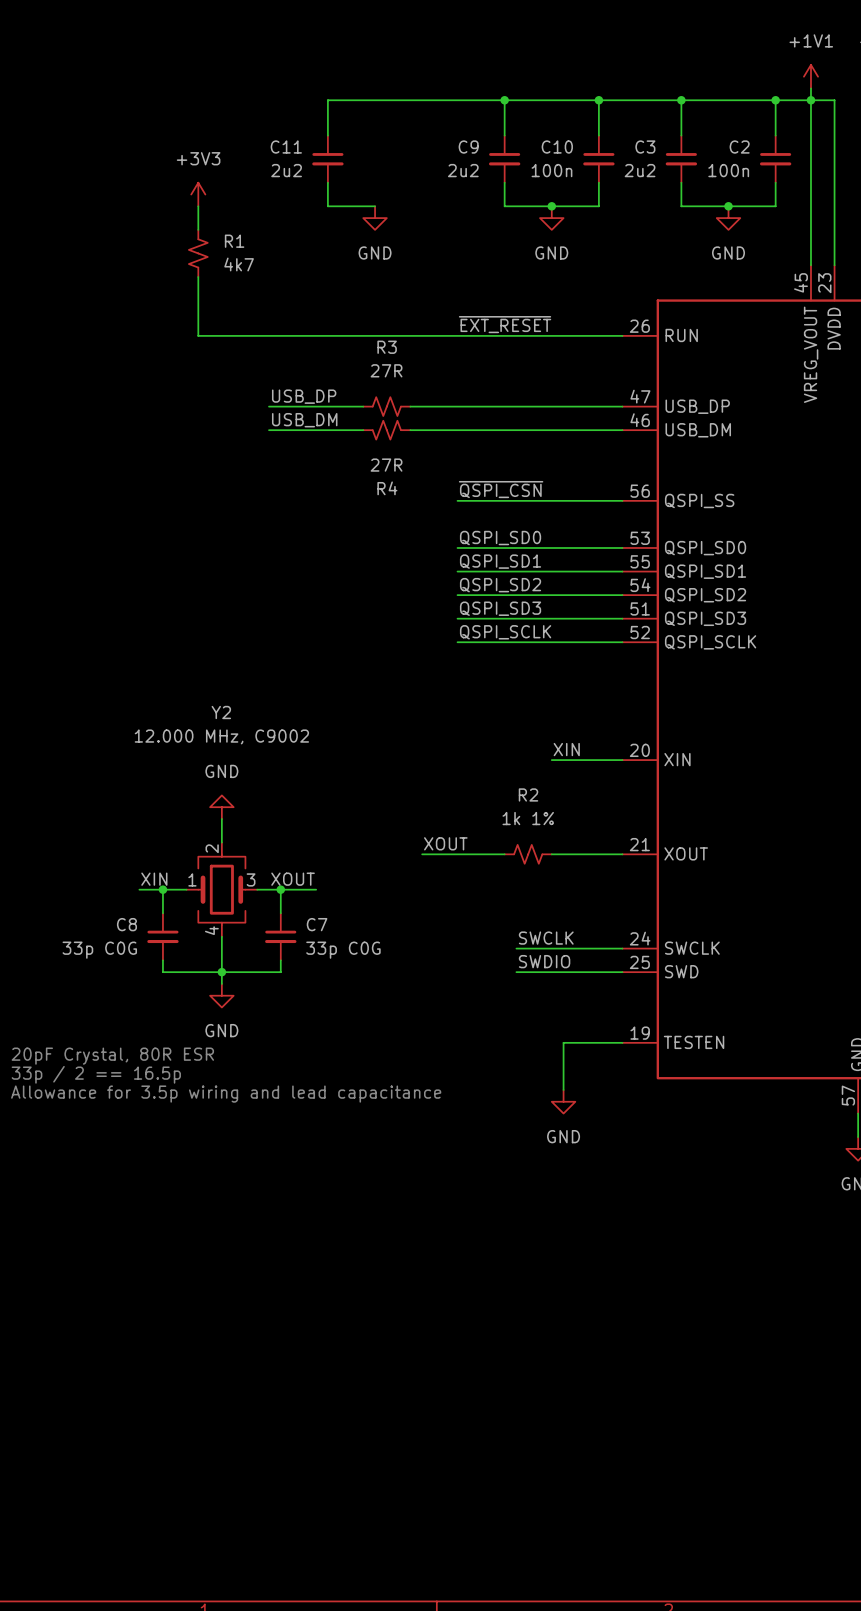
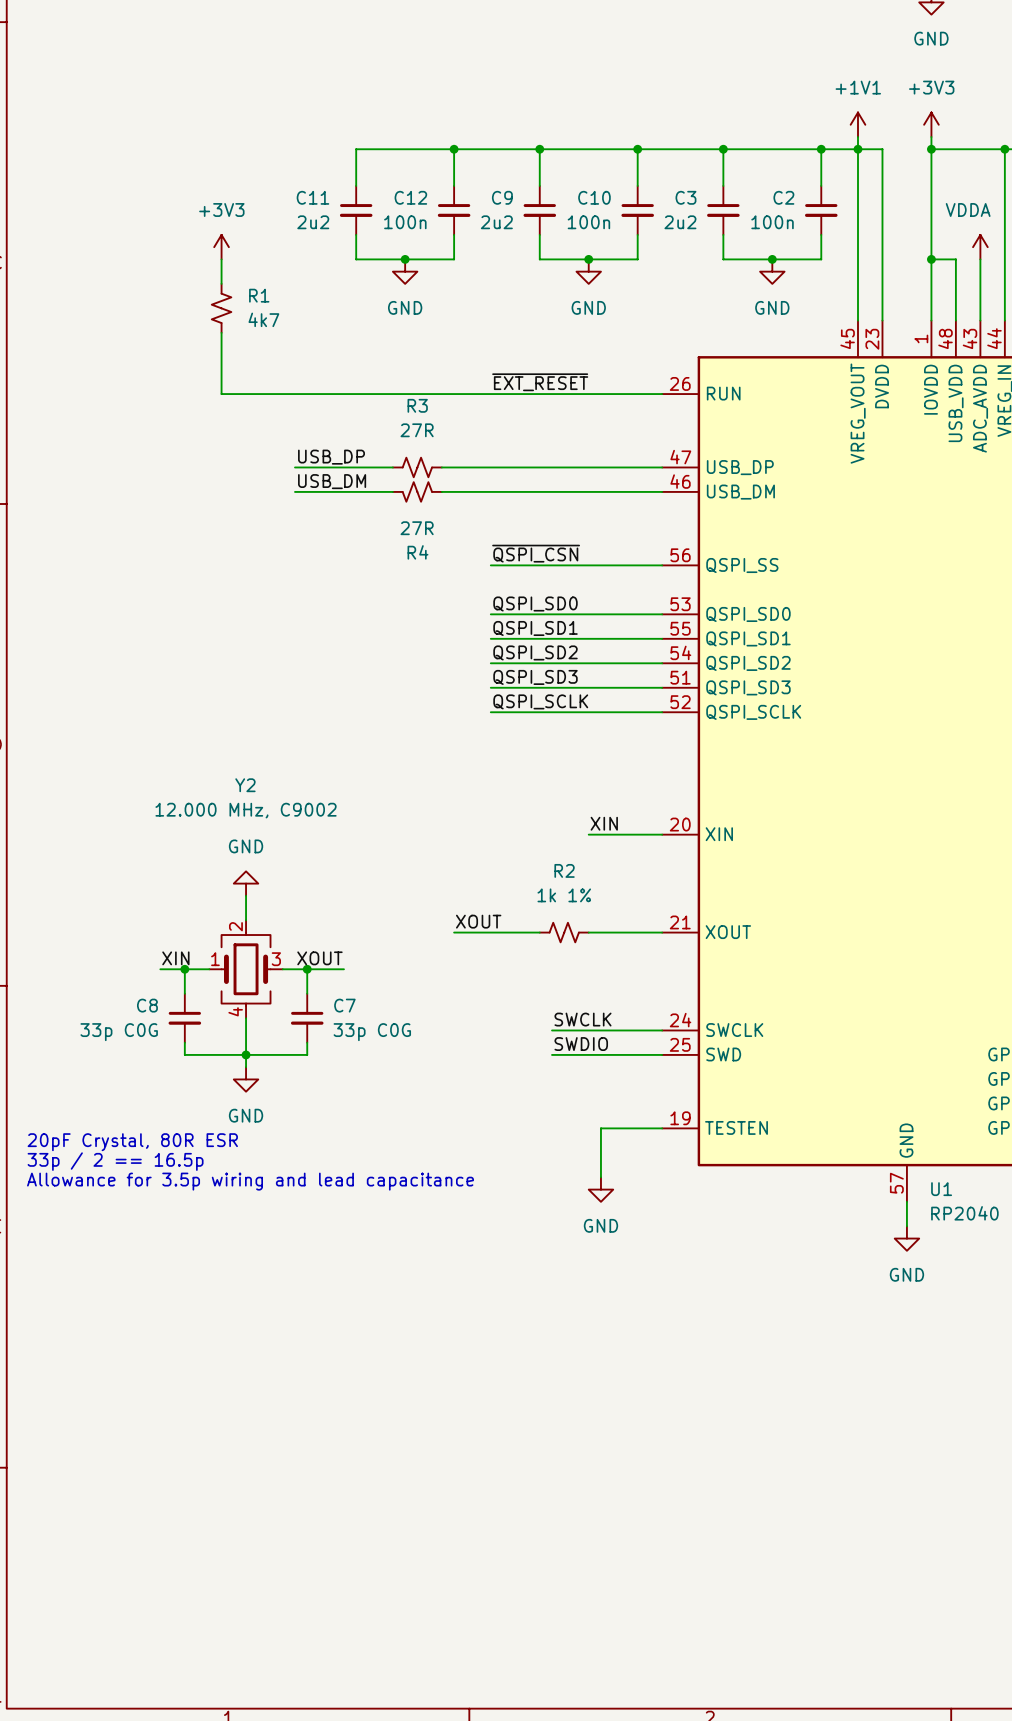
wire: none -> (454, 149) (454, 185)
junction: none -> (454, 149)
C12: none -> 100n (454, 210)
wire: none -> (454, 234) (454, 259) (405, 259)
junction: none -> (405, 259)

